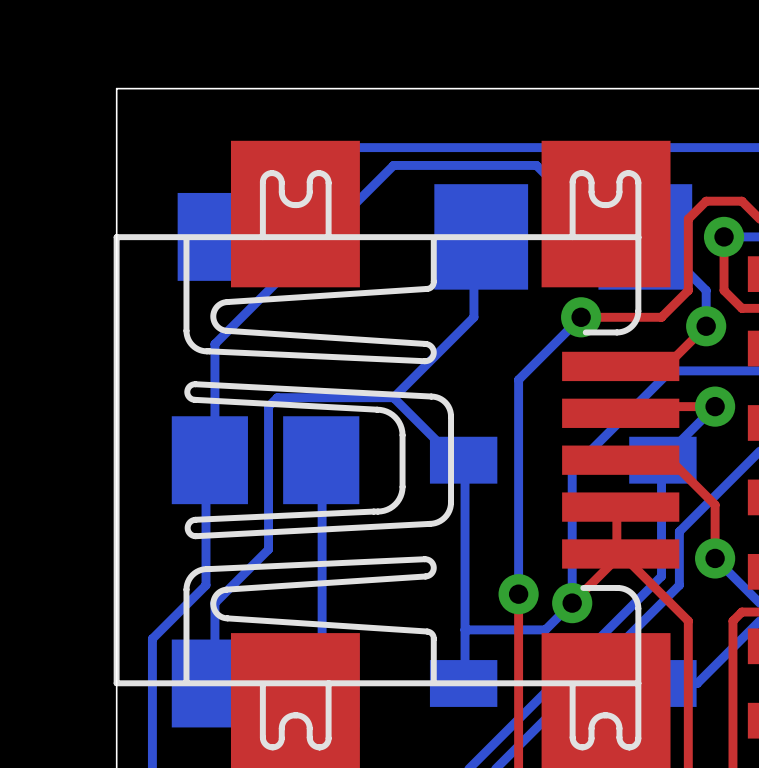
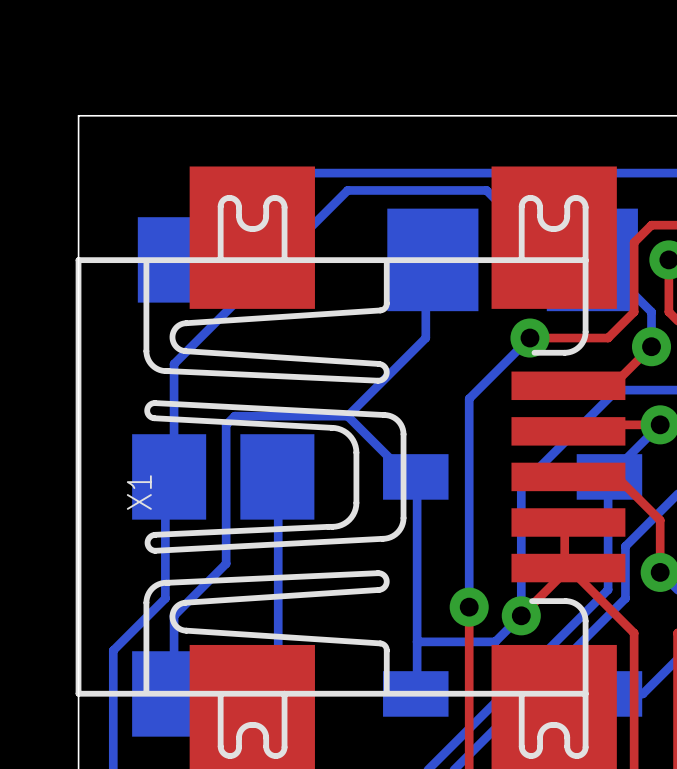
X1 name: none -> X1 (139, 492)

